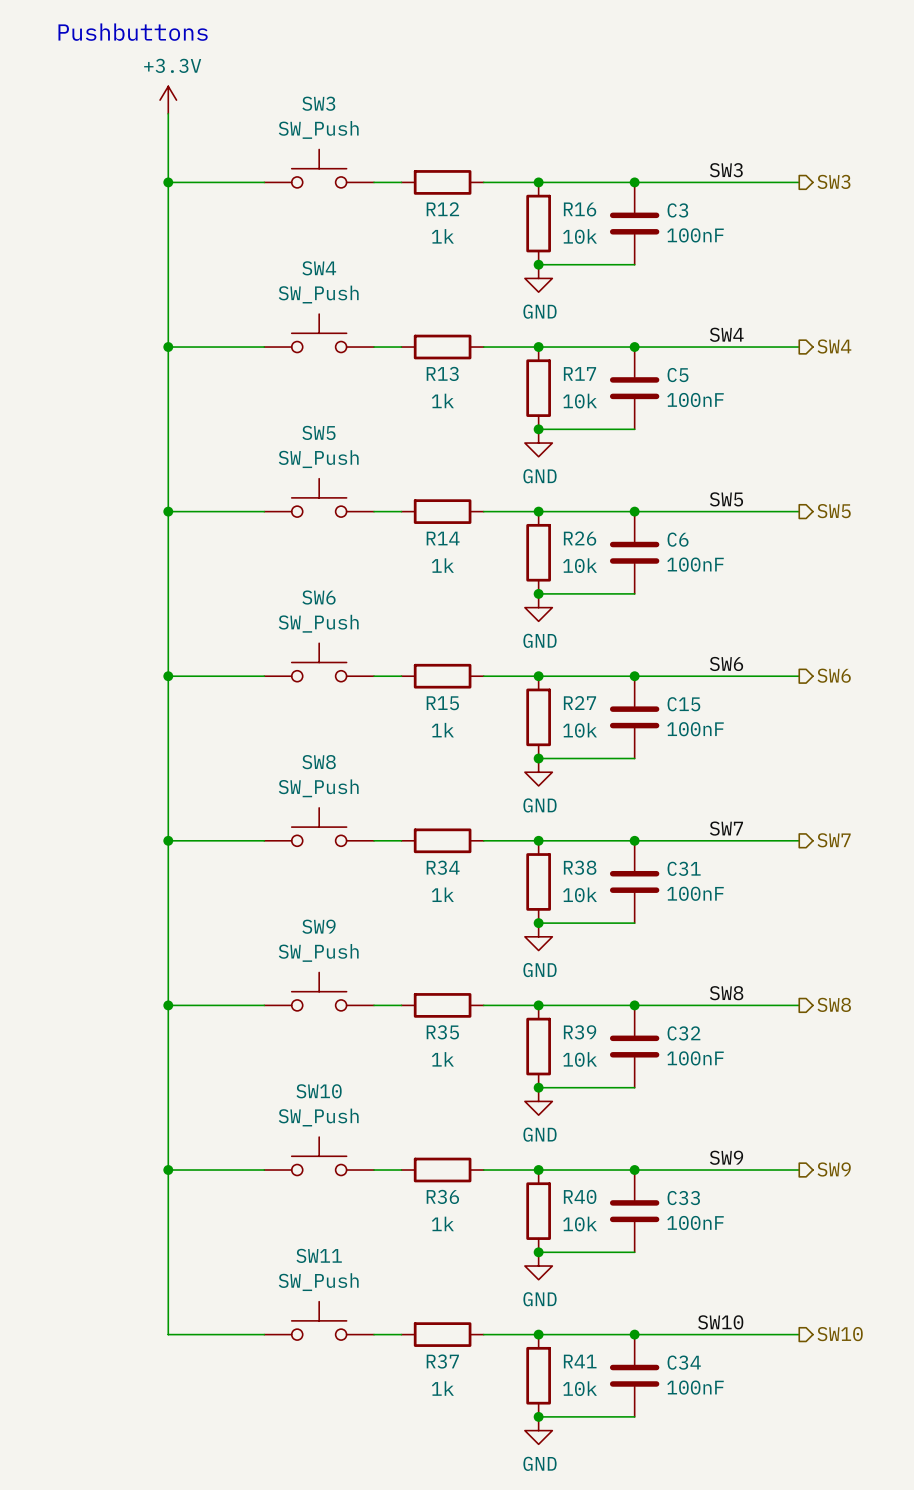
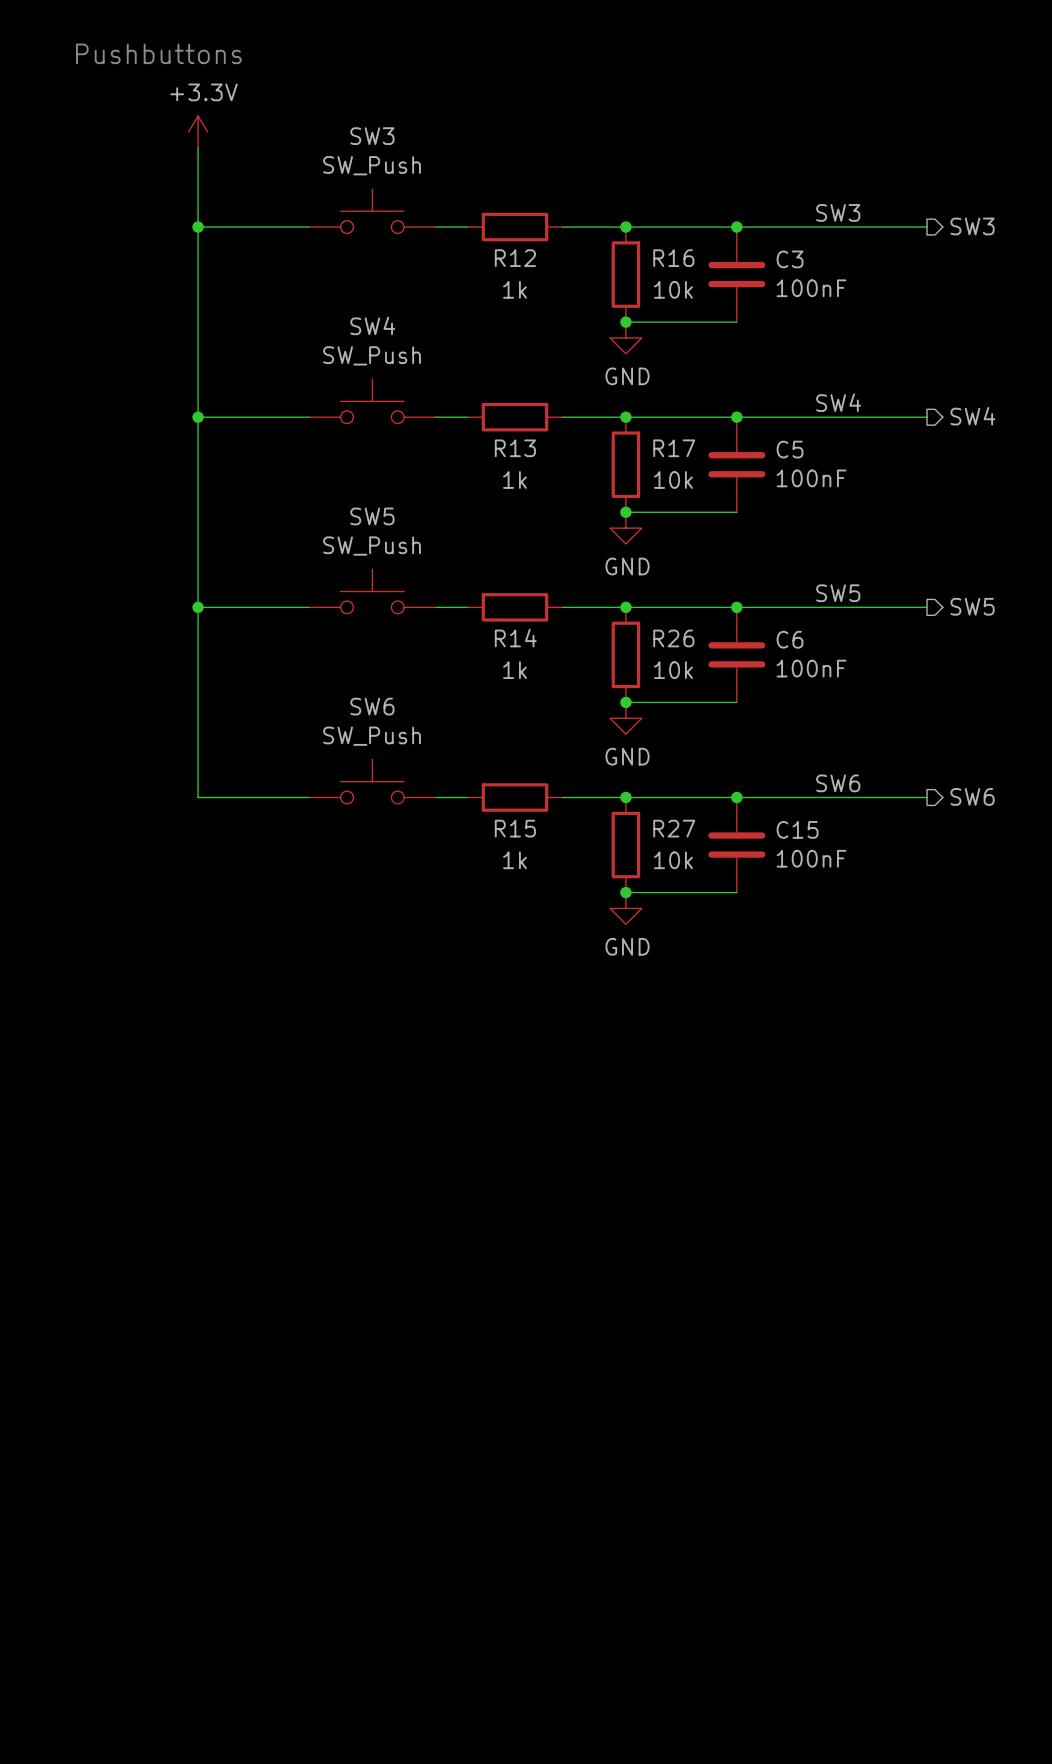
wire: (168, 676) (168, 1334) (264, 1334) -> none
junction: (168, 676) -> none
SW8: SW_Push (319, 827) -> none
label: SW7 (726, 828) -> none
wire: (168, 840) (264, 840) -> none
junction: (168, 840) -> none
wire: (374, 840) (401, 840) -> none
R34: 1k (442, 840) -> none
wire: (483, 840) (799, 840) -> none
junction: (538, 840) -> none
junction: (634, 840) -> none
hierarchical label: SW7 (834, 840) -> none
R38: 10k (538, 881) -> none
C31: 100nF (634, 881) -> none
wire: (538, 923) (634, 923) -> none
junction: (538, 923) -> none
power symbol: GND (538, 936) -> none
SW9: SW_Push (319, 991) -> none
label: SW8 (726, 993) -> none
hierarchical label: SW8 (834, 1004) -> none
wire: (168, 1005) (264, 1005) -> none
junction: (168, 1005) -> none
wire: (374, 1005) (401, 1005) -> none
R35: 1k (442, 1005) -> none
wire: (483, 1005) (799, 1005) -> none
junction: (538, 1005) -> none
junction: (634, 1005) -> none
R39: 10k (538, 1046) -> none
C32: 100nF (634, 1046) -> none
wire: (538, 1087) (634, 1087) -> none
junction: (538, 1087) -> none
power symbol: GND (538, 1101) -> none
SW10: SW_Push (319, 1156) -> none
label: SW9 (726, 1157) -> none
hierarchical label: SW9 (834, 1169) -> none
wire: (168, 1170) (264, 1170) -> none
junction: (168, 1170) -> none
wire: (374, 1170) (401, 1170) -> none
R36: 1k (442, 1170) -> none
wire: (483, 1170) (799, 1170) -> none
junction: (538, 1170) -> none
junction: (634, 1170) -> none
R40: 10k (538, 1211) -> none
C33: 100nF (634, 1211) -> none
wire: (538, 1252) (634, 1252) -> none
junction: (538, 1252) -> none
power symbol: GND (538, 1266) -> none
SW11: SW_Push (319, 1320) -> none
label: SW10 (720, 1322) -> none
wire: (374, 1334) (401, 1334) -> none
R37: 1k (442, 1334) -> none
wire: (483, 1334) (799, 1334) -> none
junction: (538, 1334) -> none
junction: (634, 1334) -> none
hierarchical label: SW10 (840, 1334) -> none
R41: 10k (538, 1375) -> none
C34: 100nF (634, 1375) -> none
wire: (538, 1416) (634, 1416) -> none
junction: (538, 1416) -> none
power symbol: GND (538, 1430) -> none

